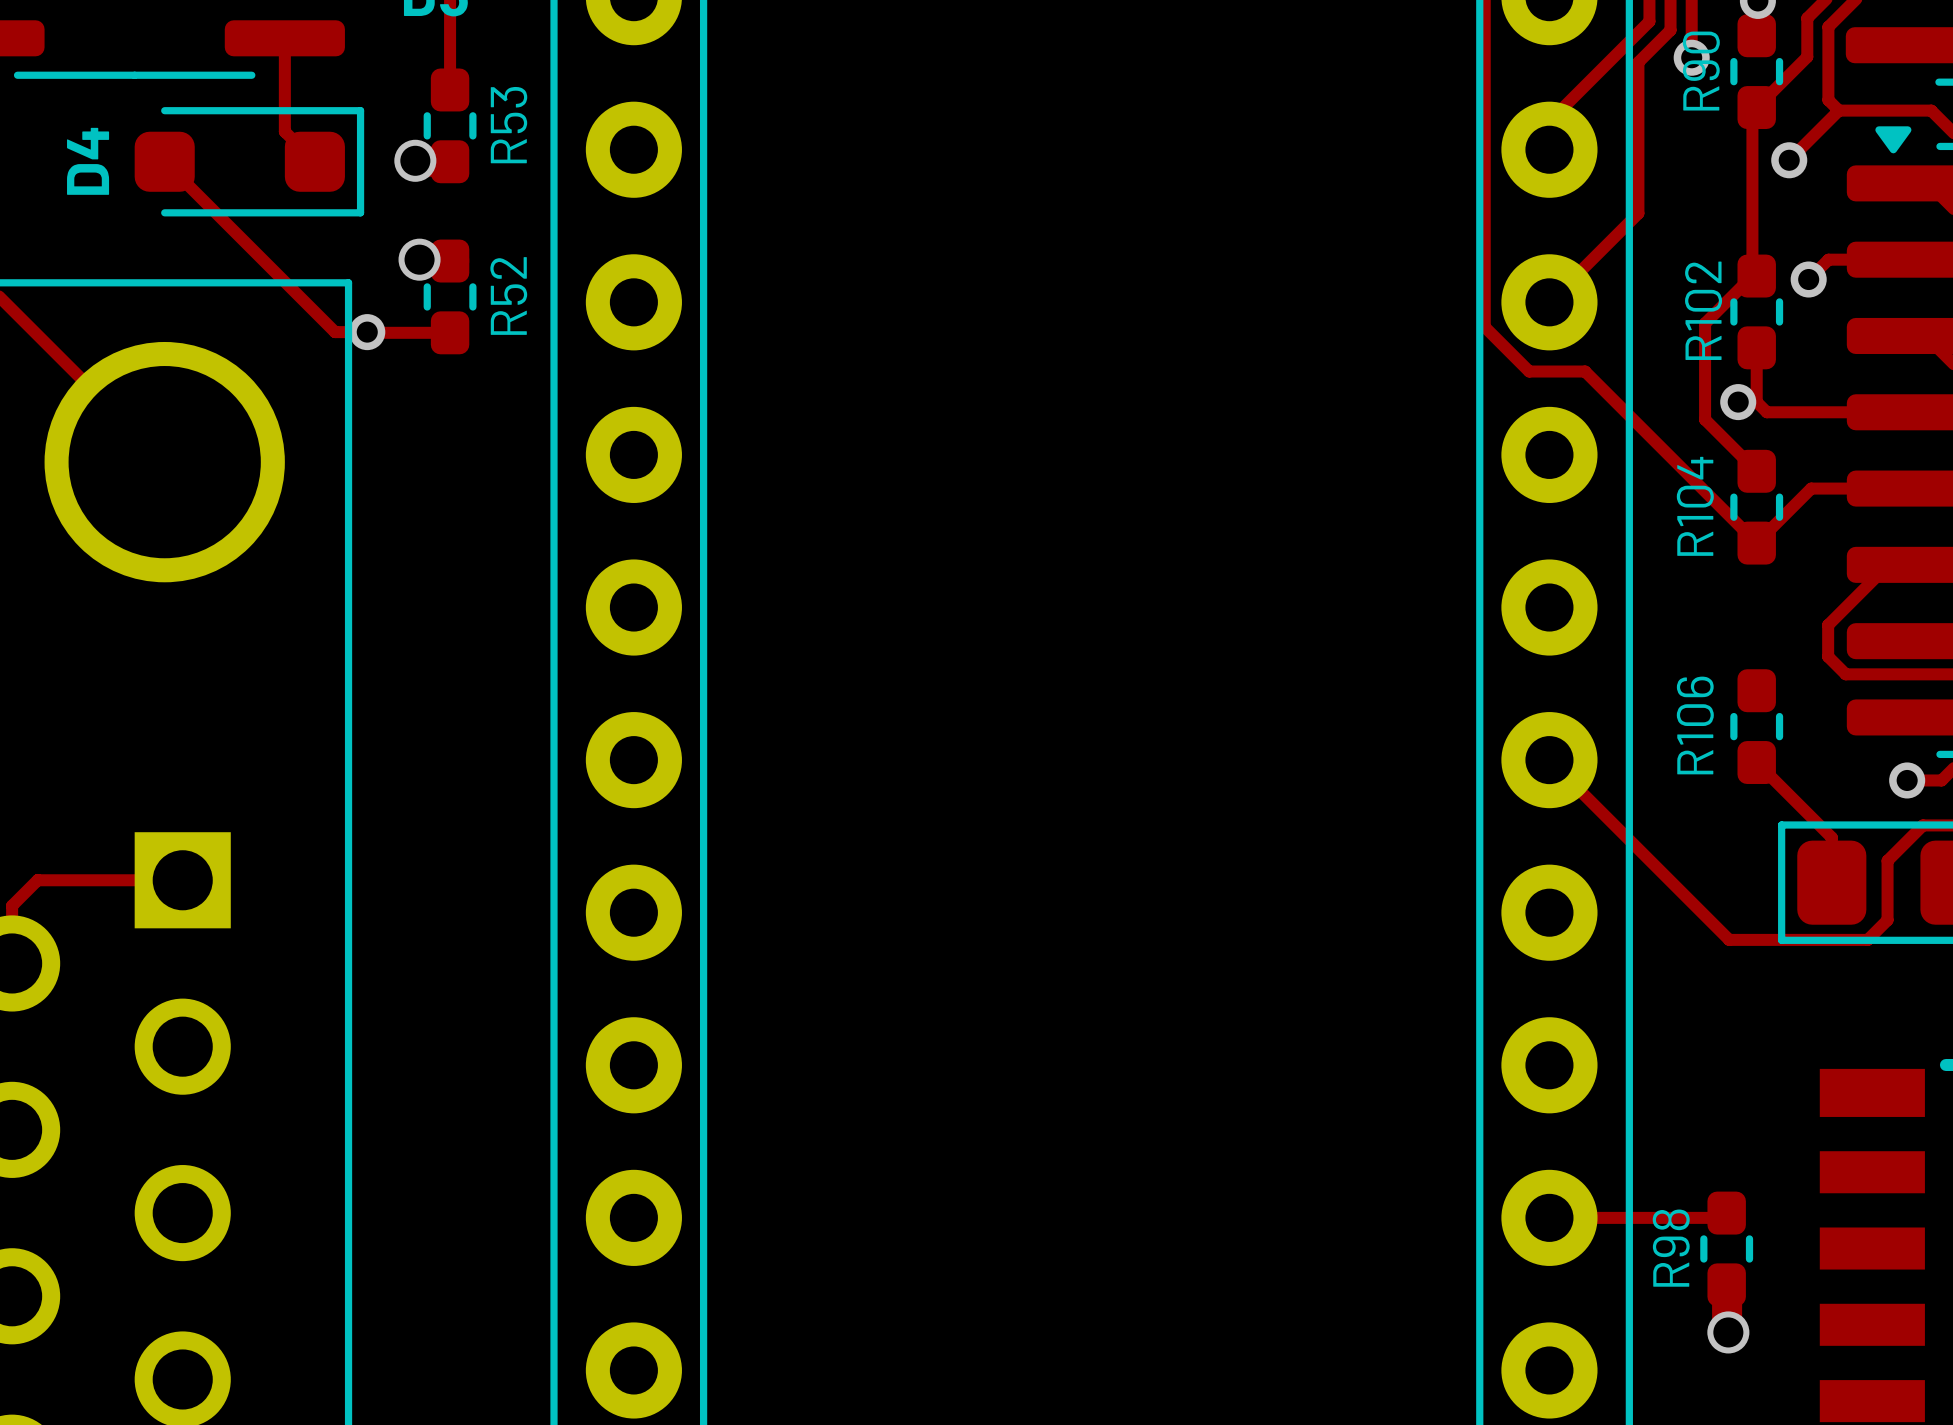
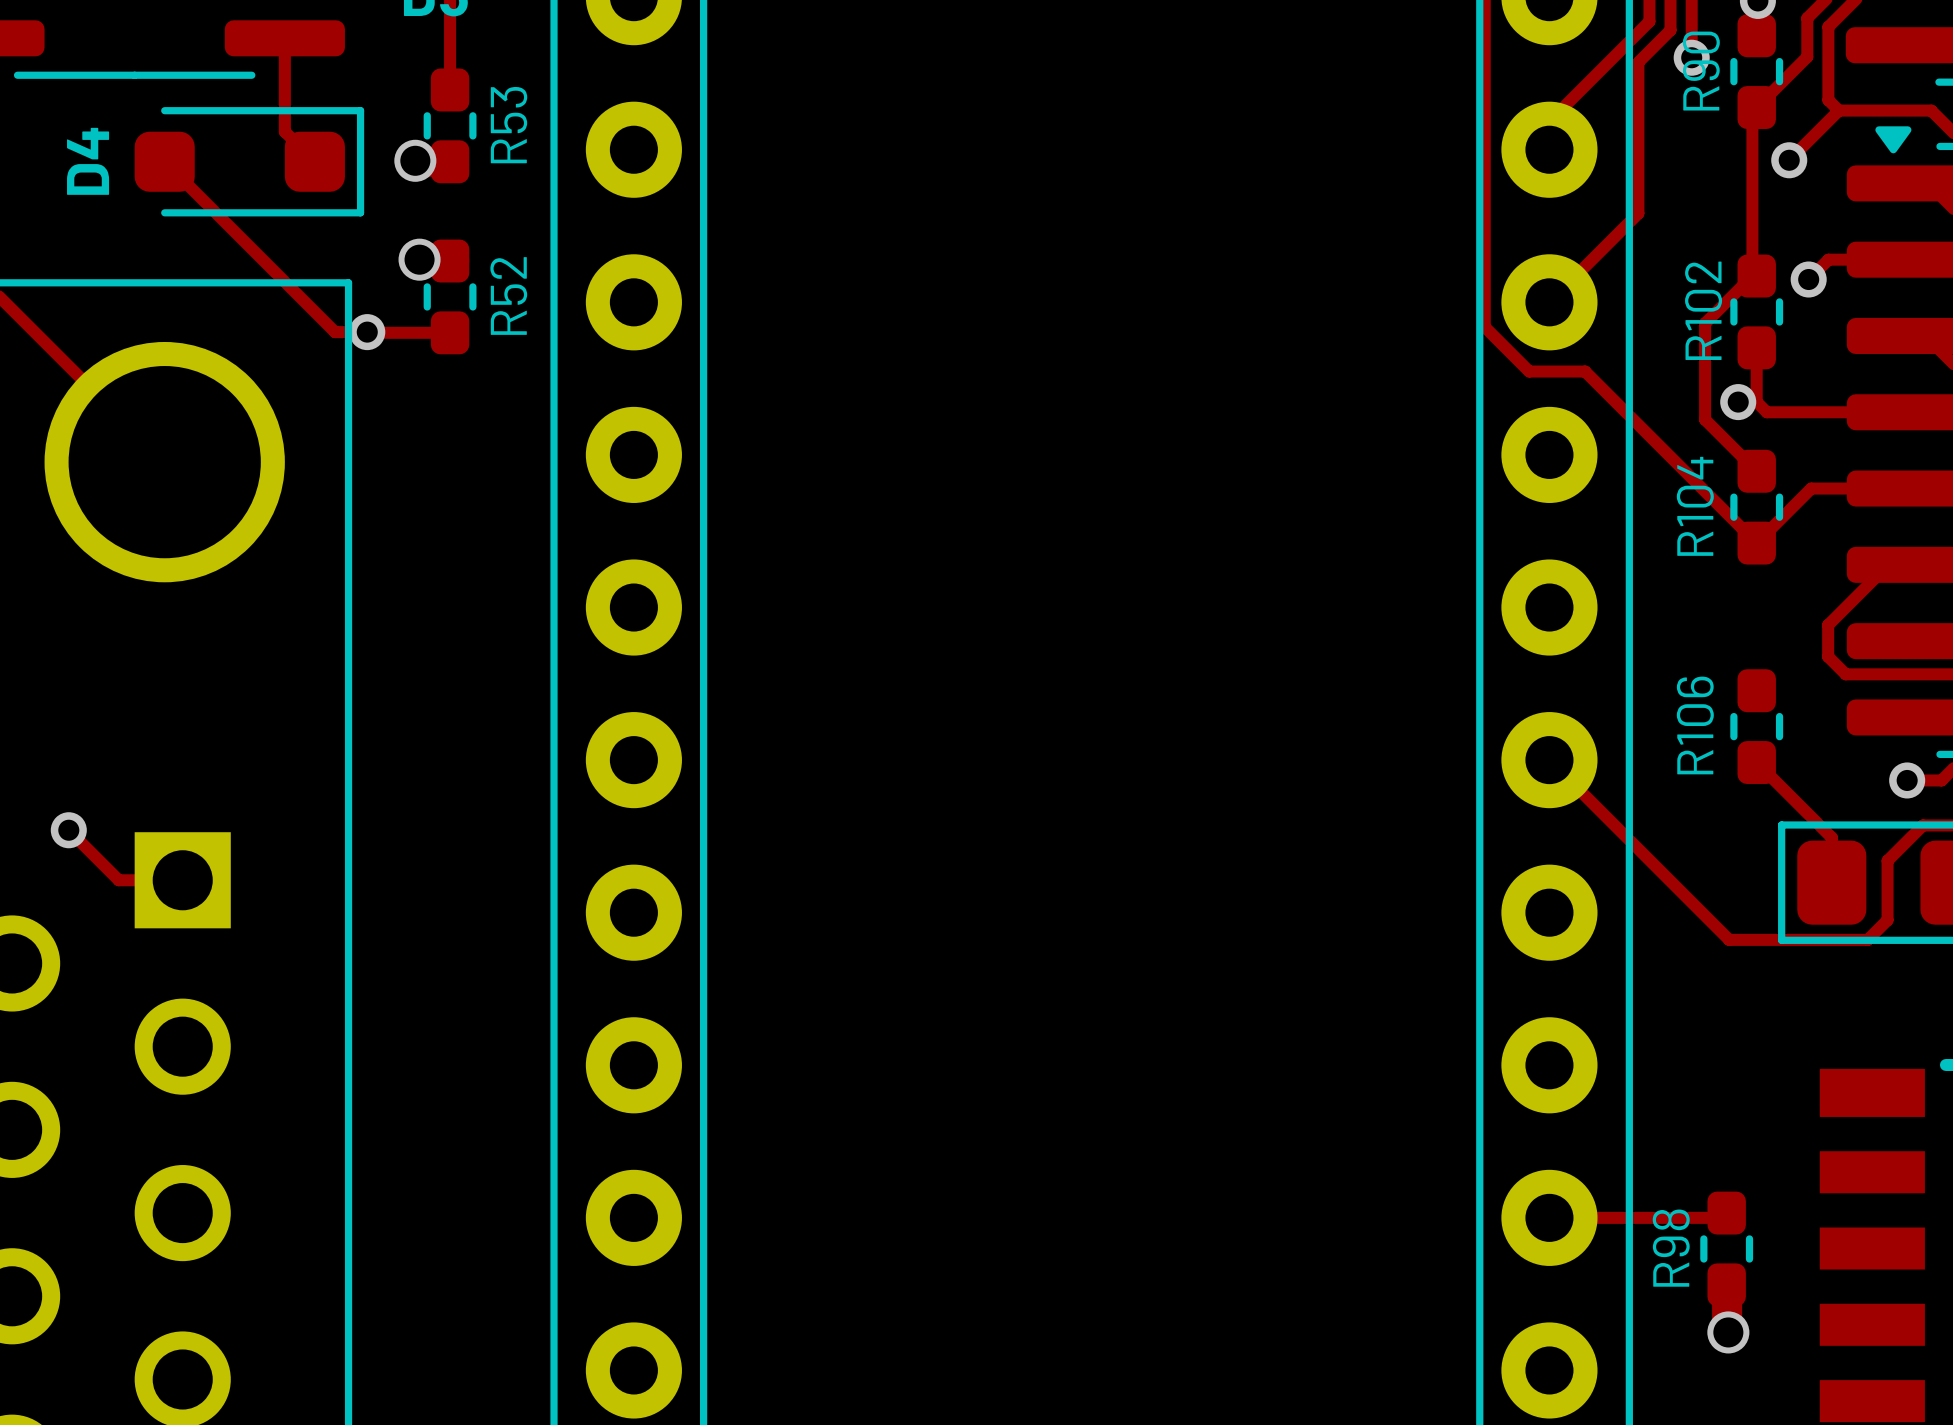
via: none -> (68, 830)
track: (37, 879) (12, 905) (12, 963) -> none
track: (38, 880) (118, 880) -> (68, 830) (118, 880)

